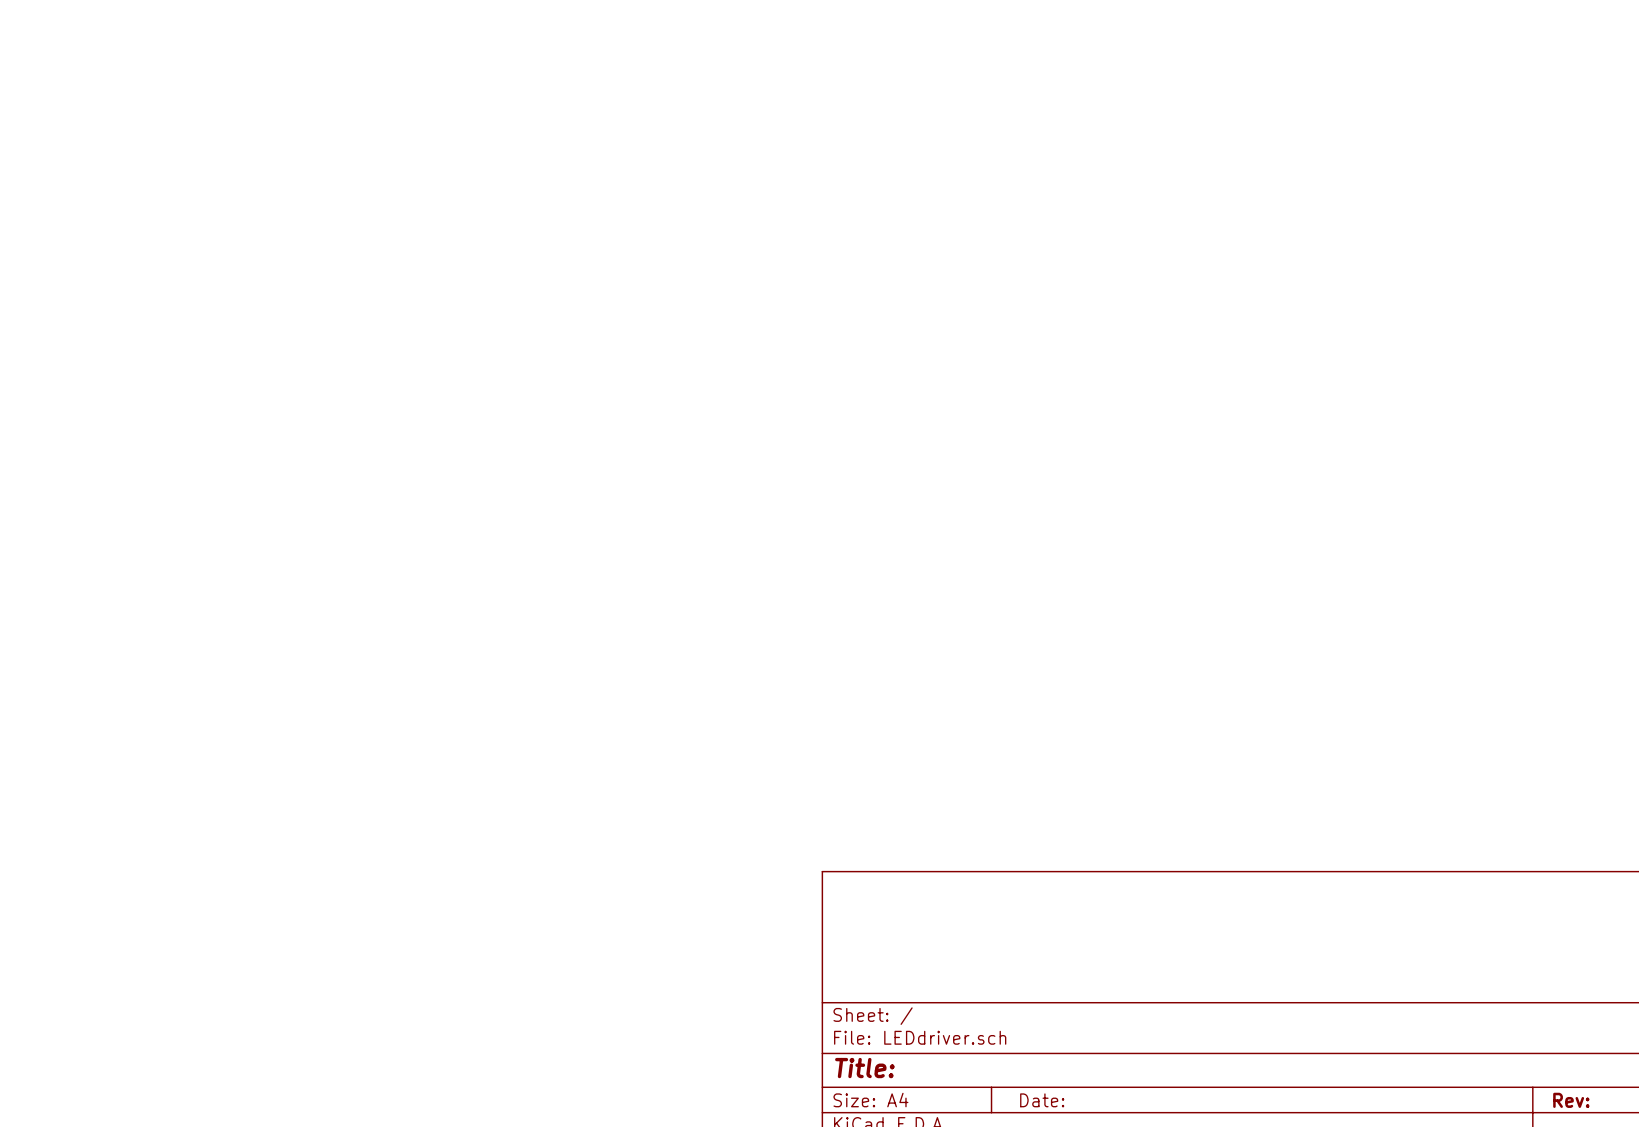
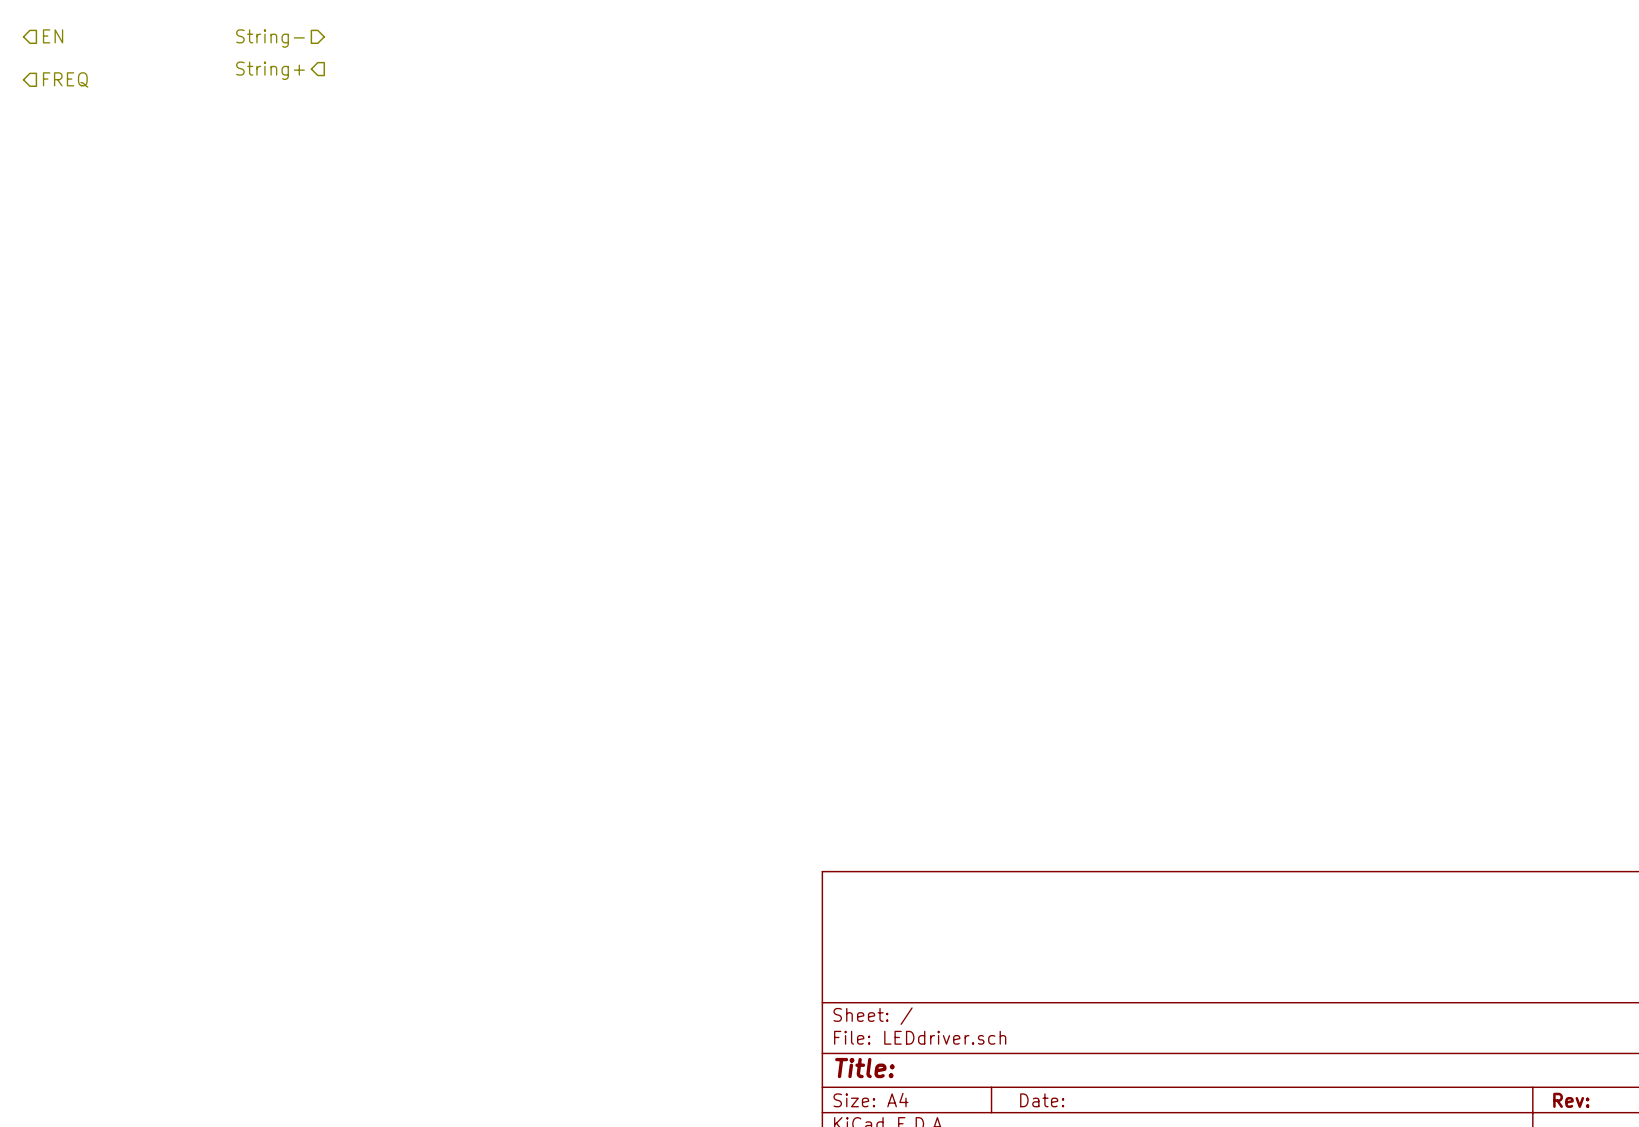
hierarchical label: none -> EN (53, 36)
hierarchical label: none -> String- (270, 38)
hierarchical label: none -> String+ (270, 70)
hierarchical label: none -> FREQ (65, 79)

